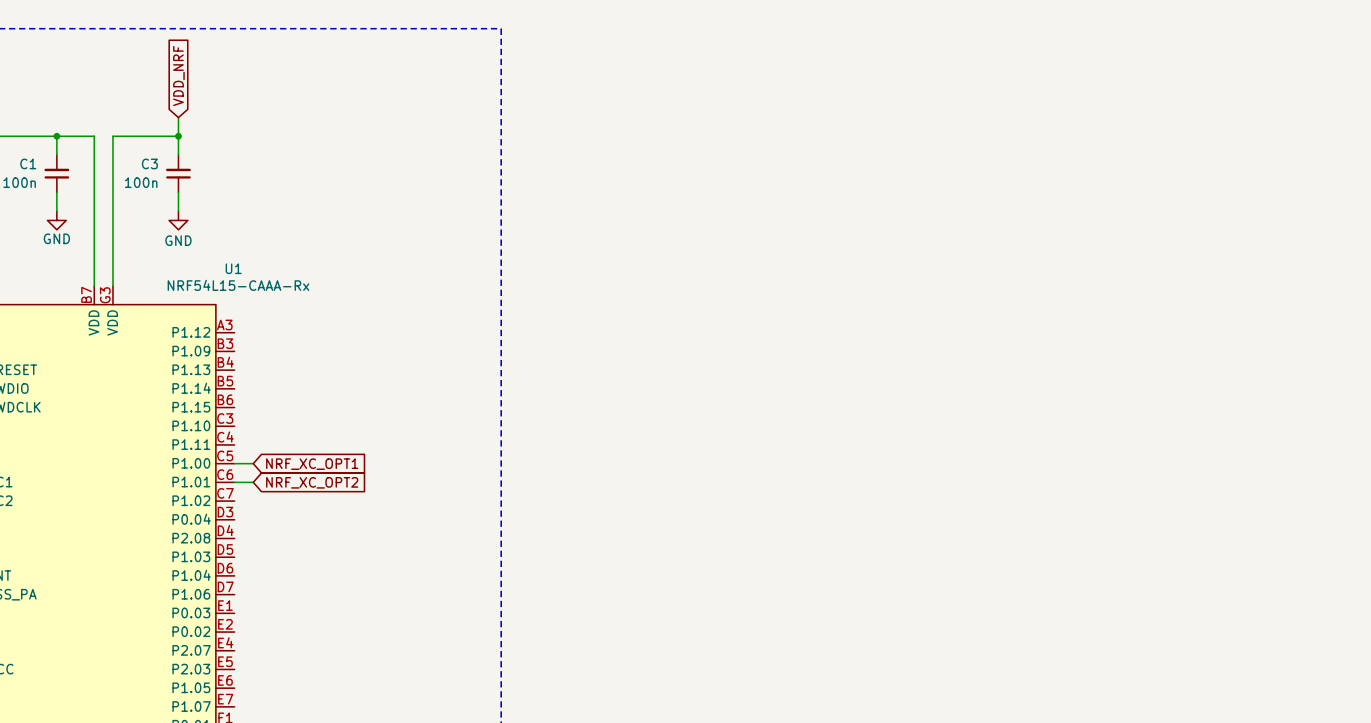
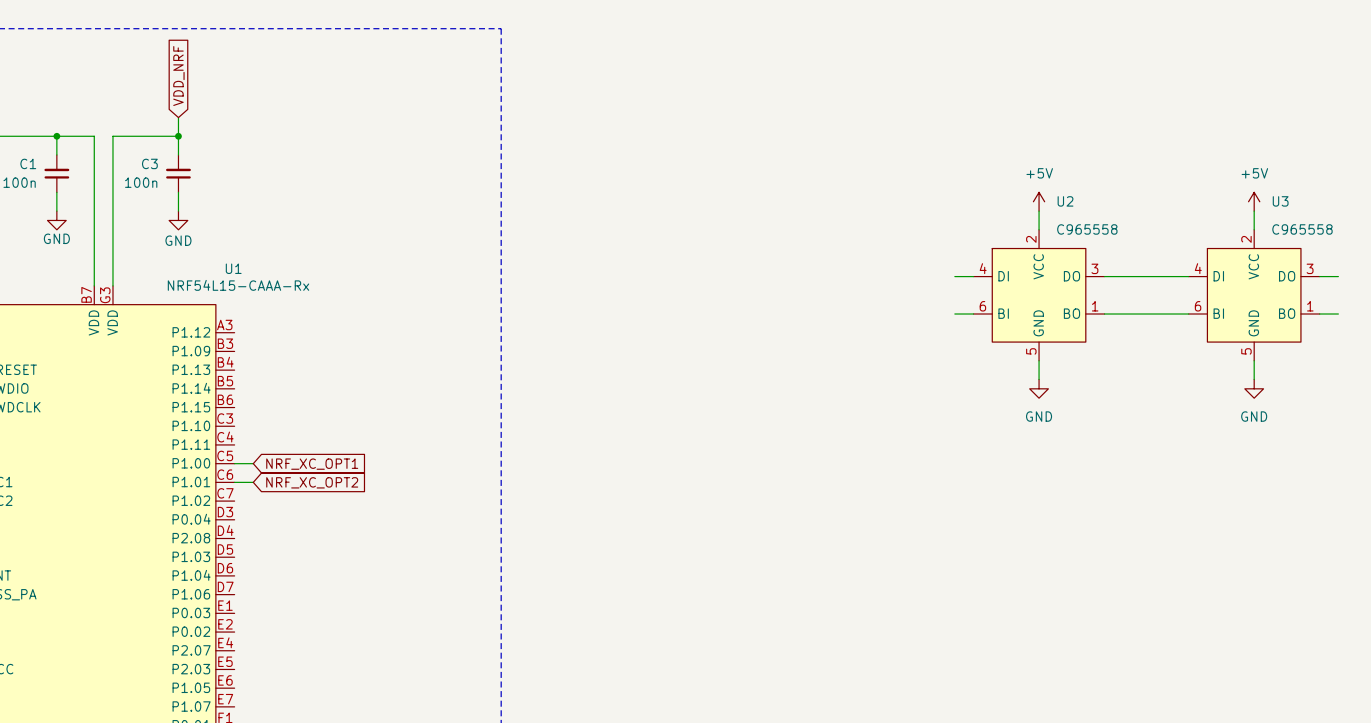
power symbol: none -> +5V (1039, 201)
power symbol: none -> +5V (1254, 201)
wire: none -> (1039, 211) (1039, 229)
wire: none -> (1254, 211) (1254, 229)
wire: none -> (954, 276) (973, 276)
wire: none -> (1104, 276) (1188, 276)
wire: none -> (1319, 276) (1338, 276)
U2: none -> (1039, 295)
U3: none -> (1254, 295)
wire: none -> (954, 314) (973, 314)
wire: none -> (1104, 314) (1188, 314)
wire: none -> (1319, 314) (1338, 314)
wire: none -> (1039, 360) (1039, 379)
wire: none -> (1254, 360) (1254, 379)
power symbol: none -> GND (1039, 388)
power symbol: none -> GND (1254, 388)

